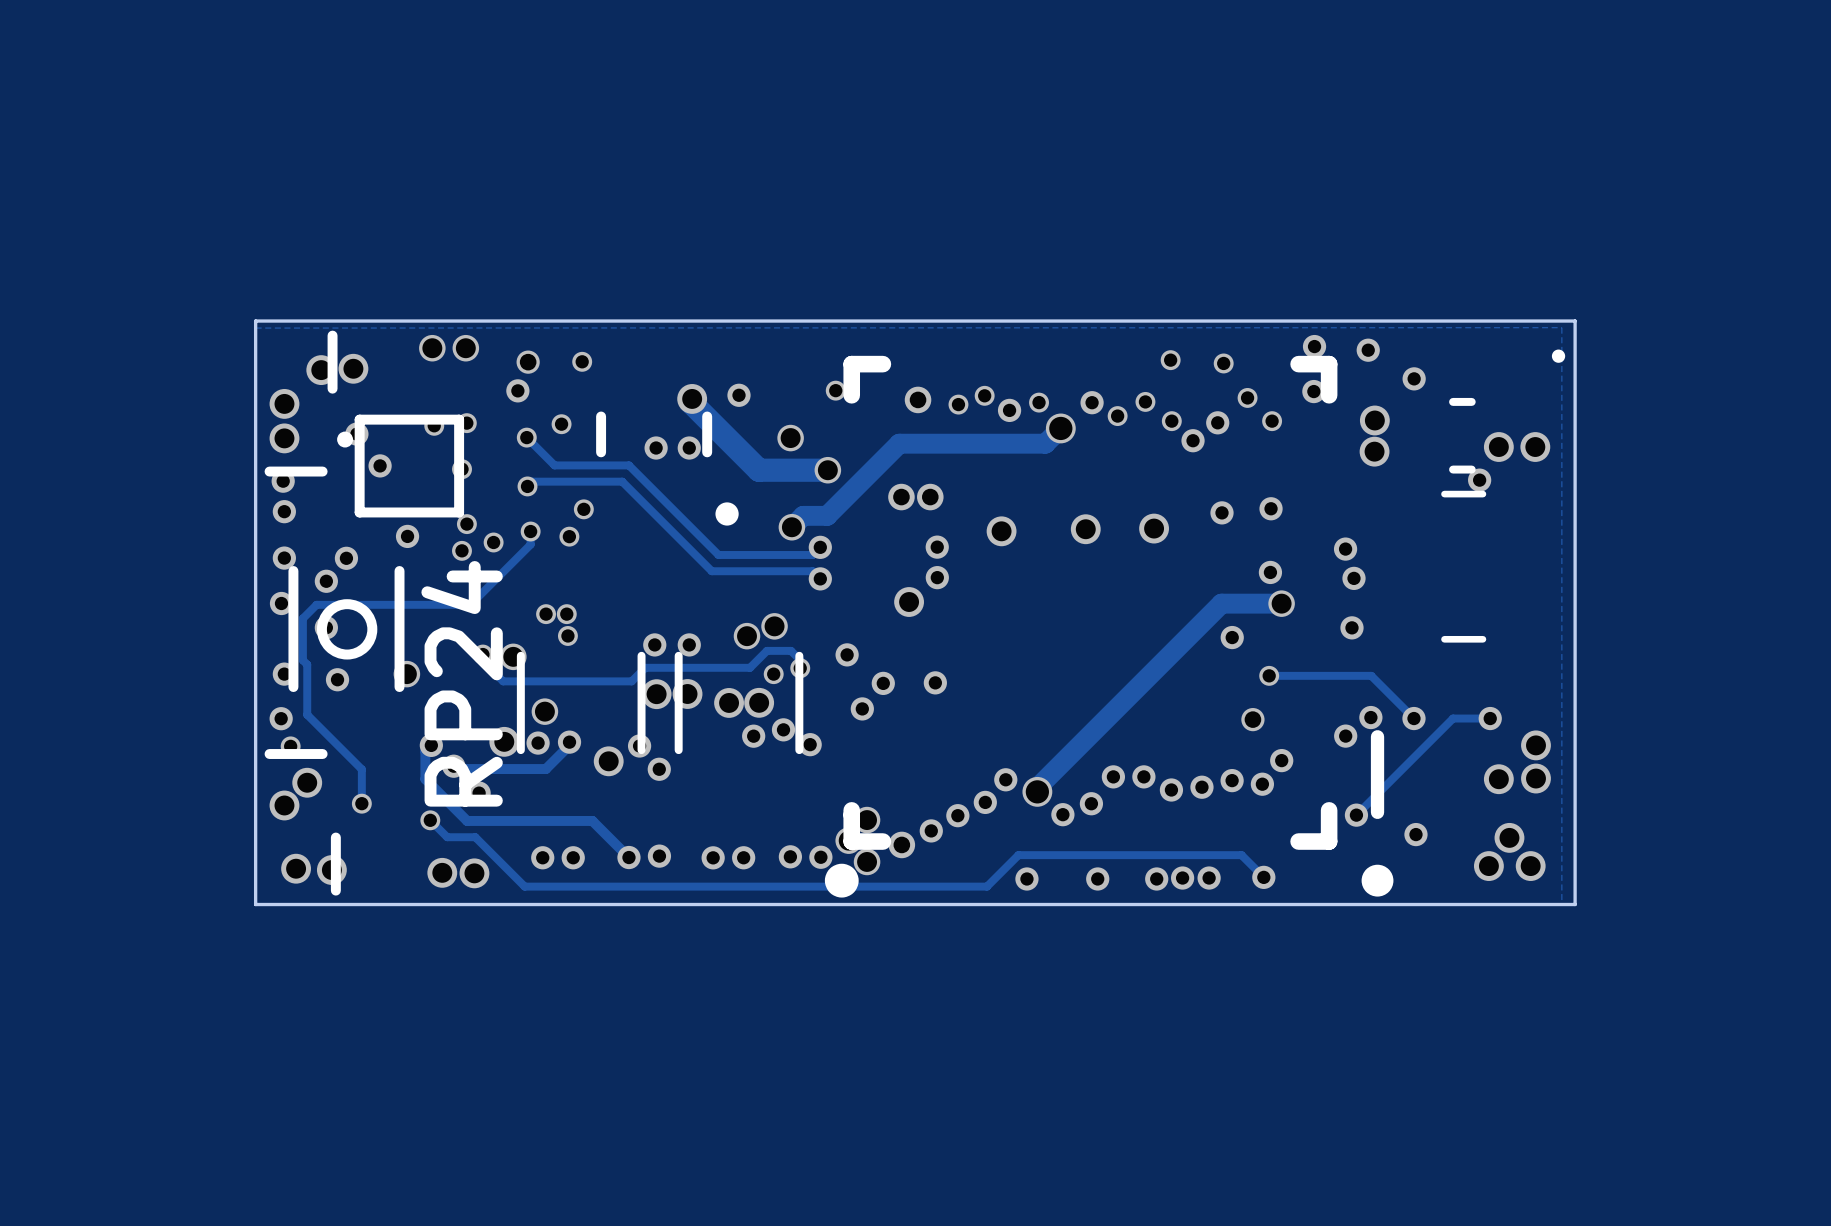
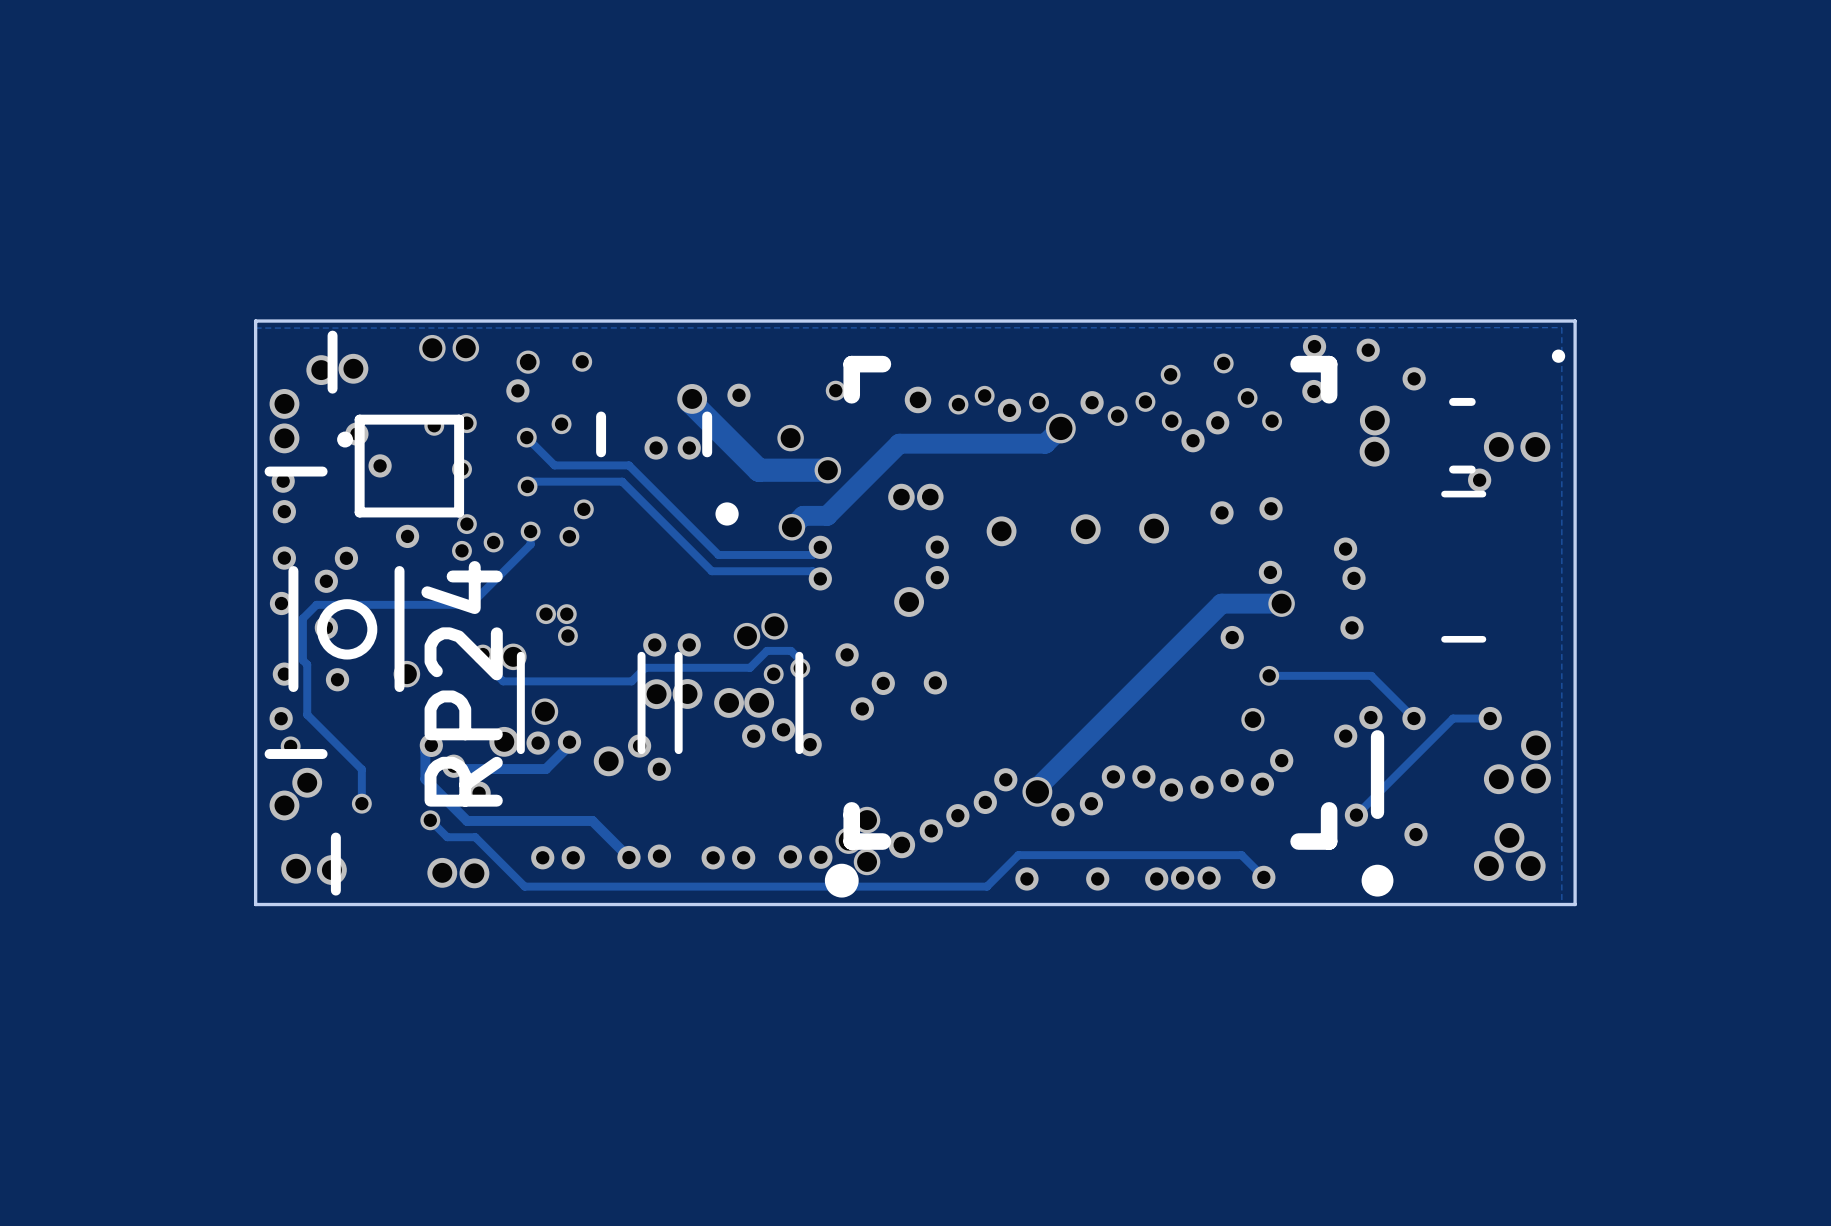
via position: (1170, 360) -> (1170, 374)

